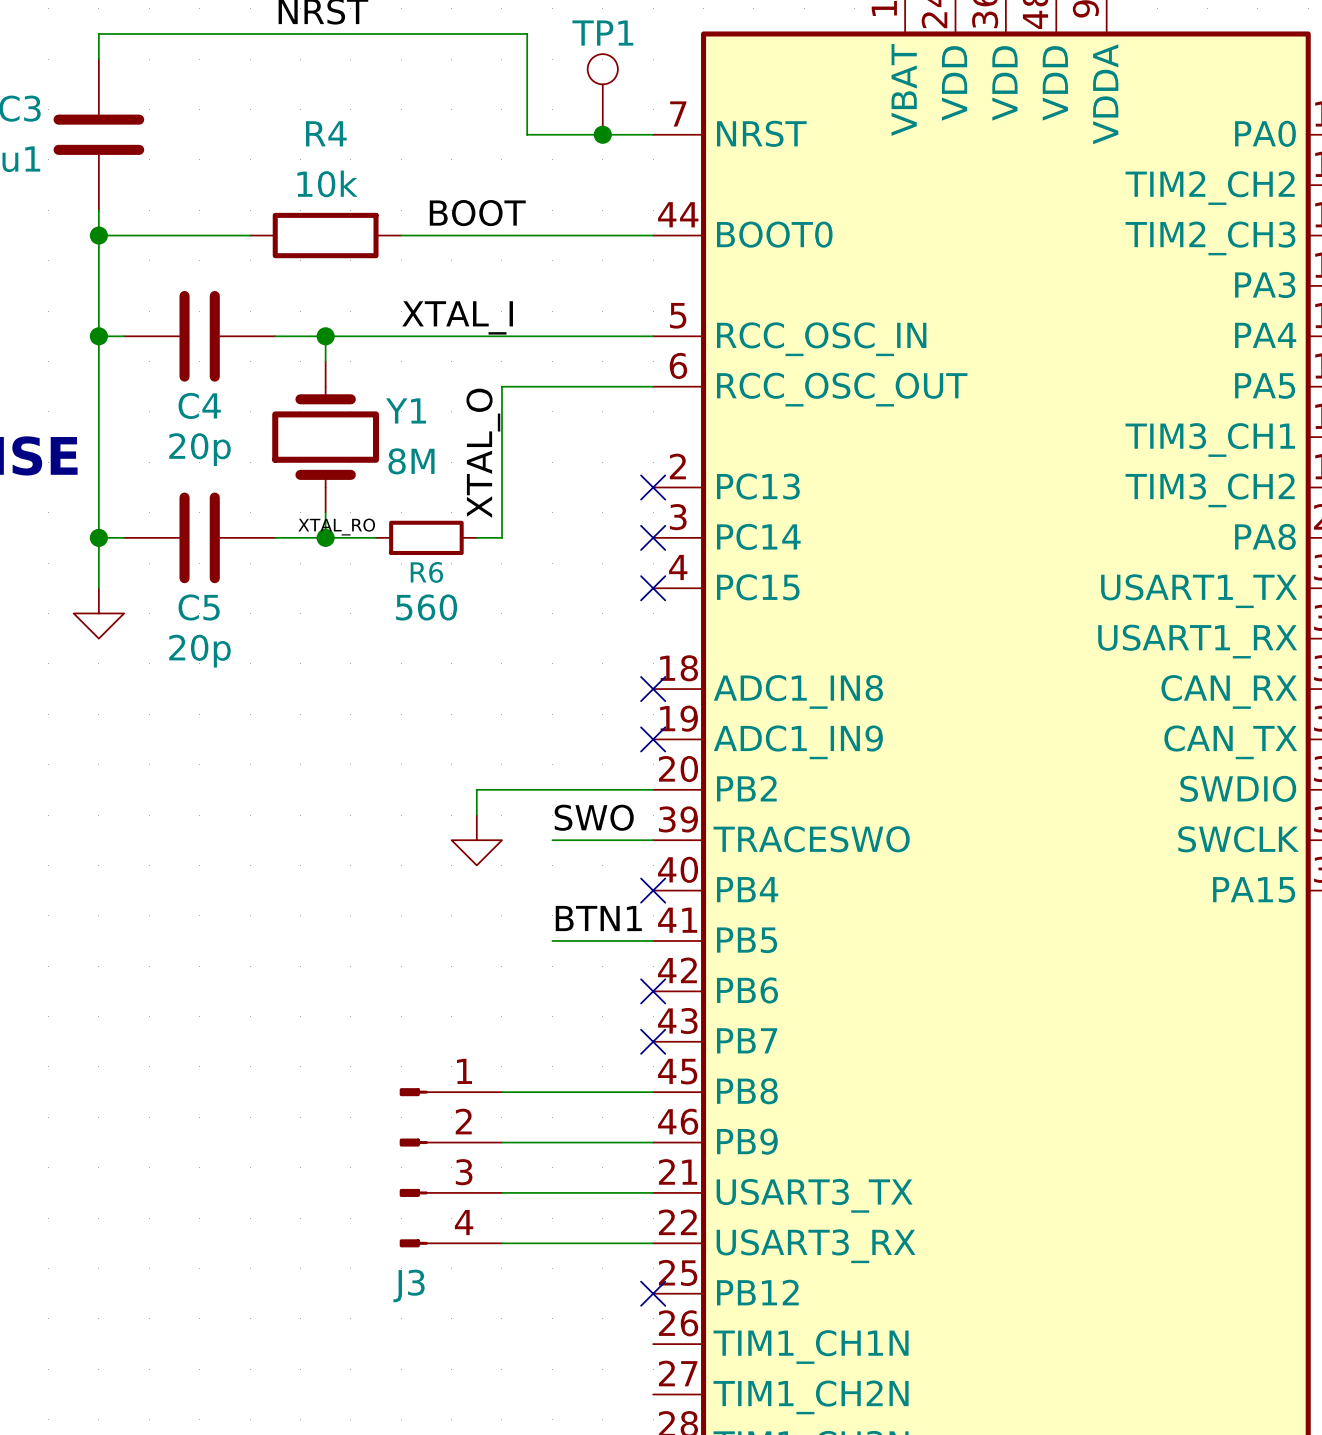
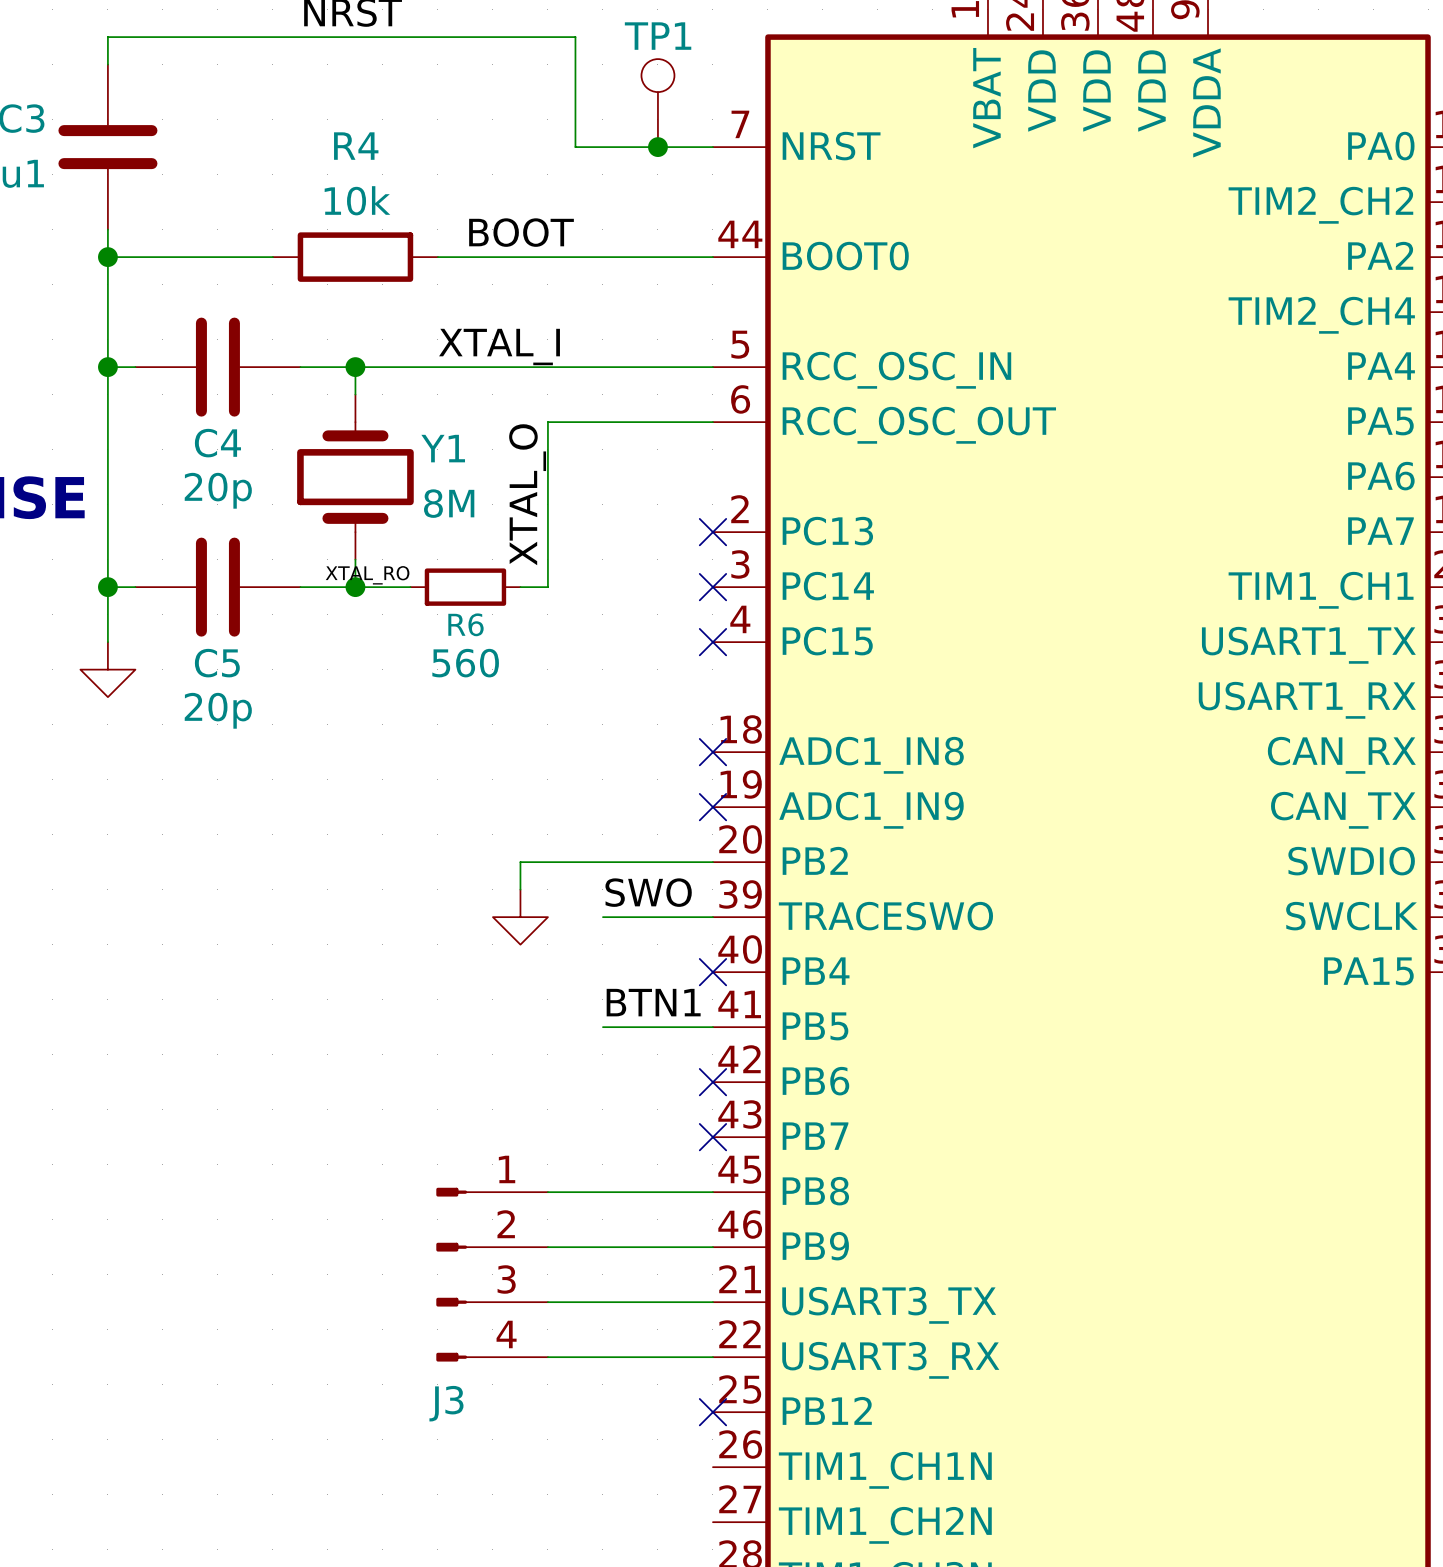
part pin name: TIM2_CH3 (1210, 238) -> PA2 (1380, 255)
part pin name: PA3 (1265, 285) -> TIM2_CH4 (1321, 315)
part pin name: TIM3_CH1 (1210, 440) -> PA6 (1381, 476)
part pin name: TIM3_CH2 (1210, 490) -> PA7 (1380, 531)
part pin name: PA8 (1265, 536) -> TIM1_CH1 (1321, 590)

